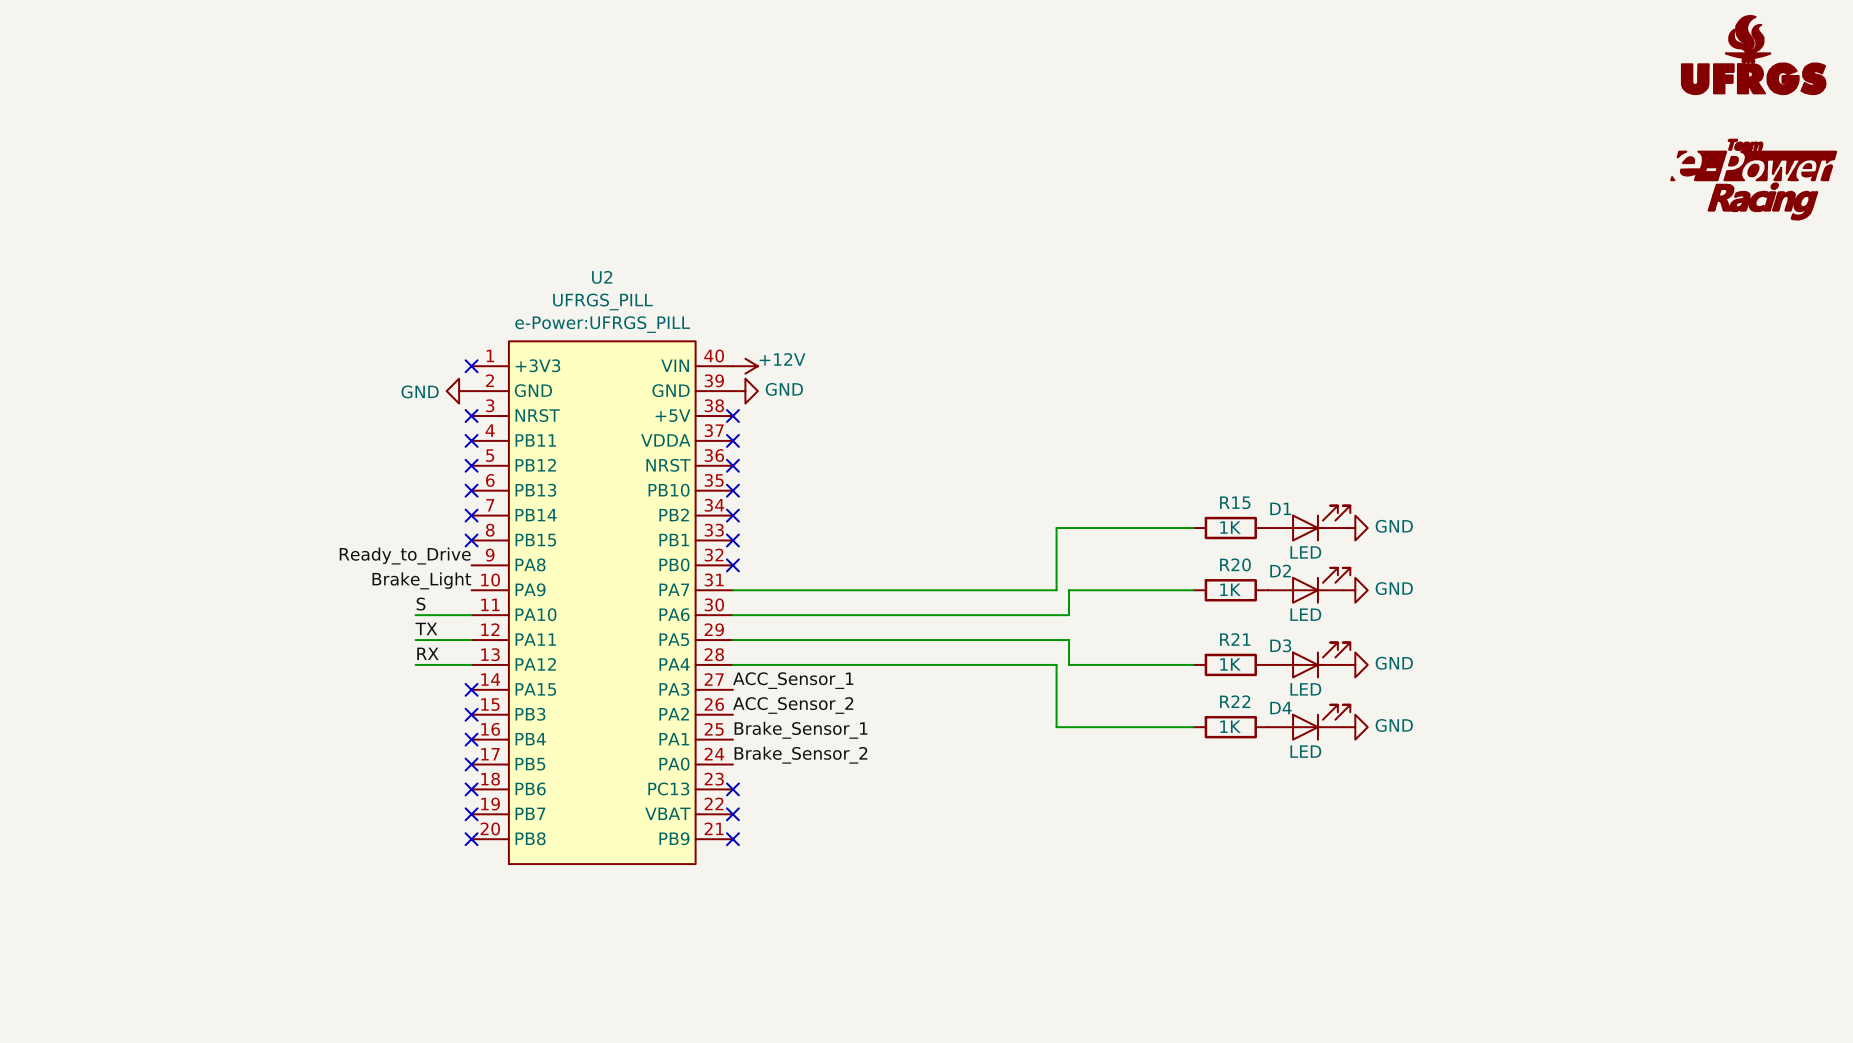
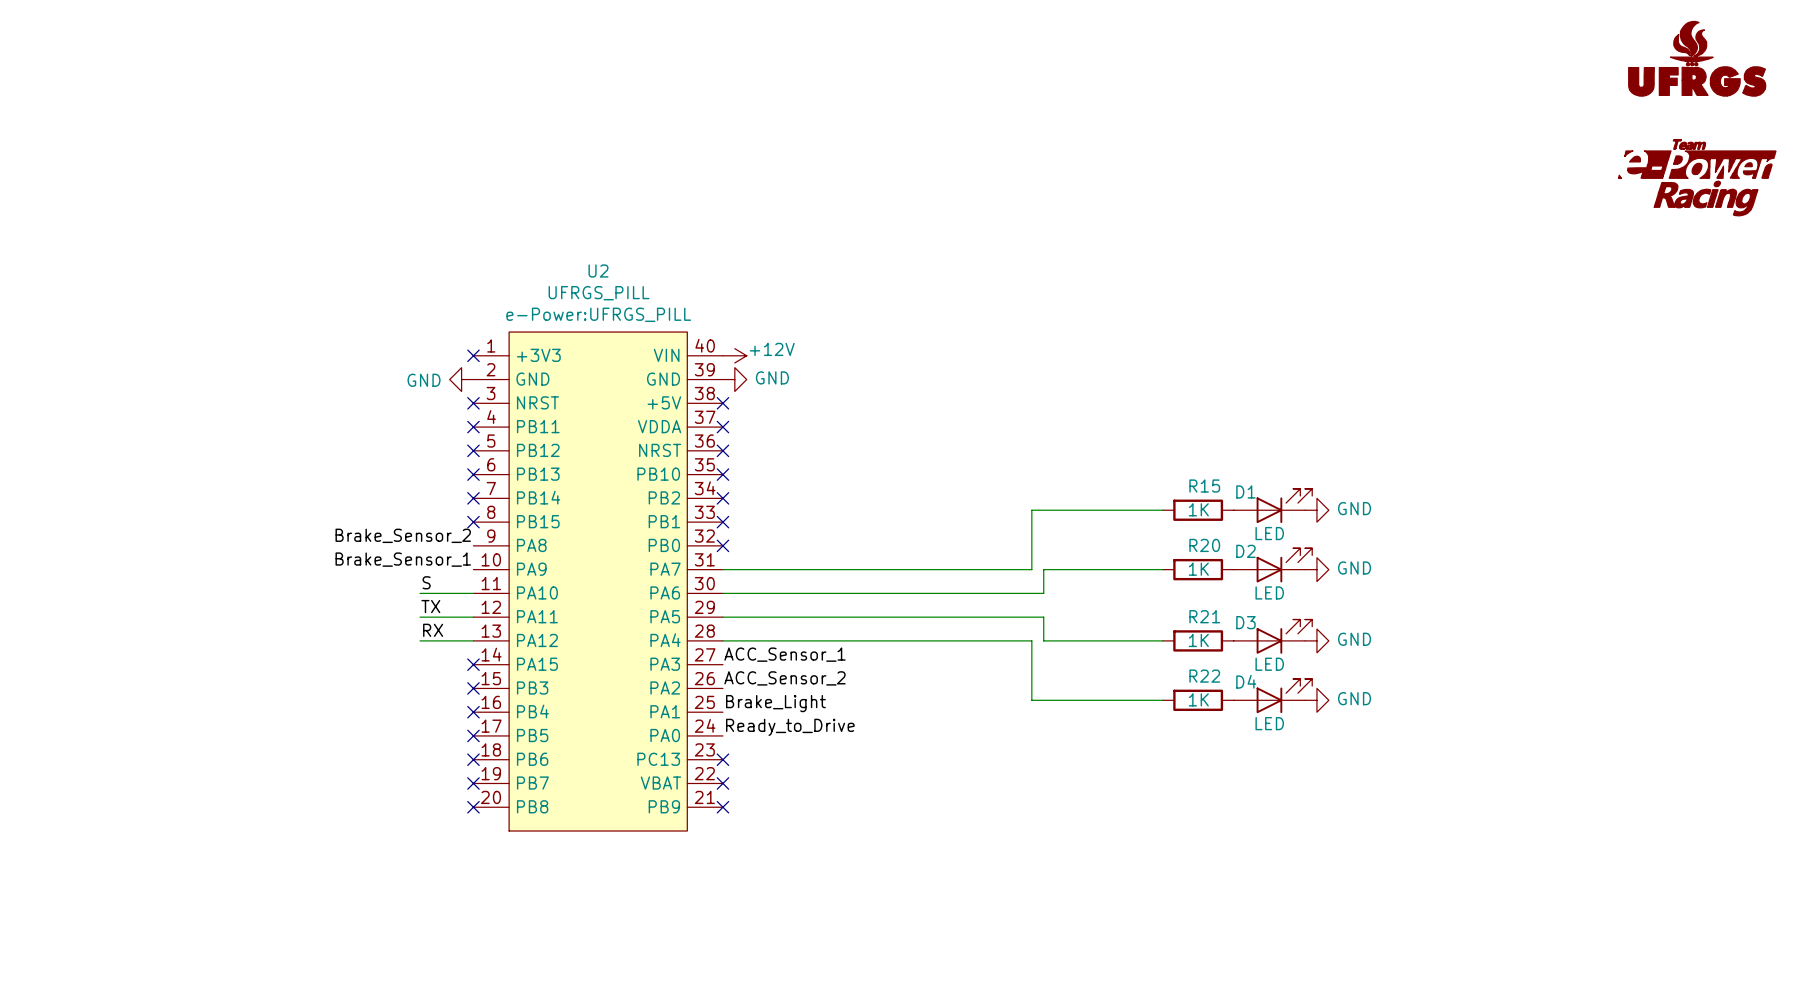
label: Ready_to_Drive (405, 556) -> Brake_Sensor_2 (403, 535)
label: Brake_Light (421, 580) -> Brake_Sensor_1 (403, 559)
label: Brake_Sensor_1 (801, 730) -> Brake_Light (775, 703)
label: Brake_Sensor_2 (800, 755) -> Ready_to_Drive (790, 727)

